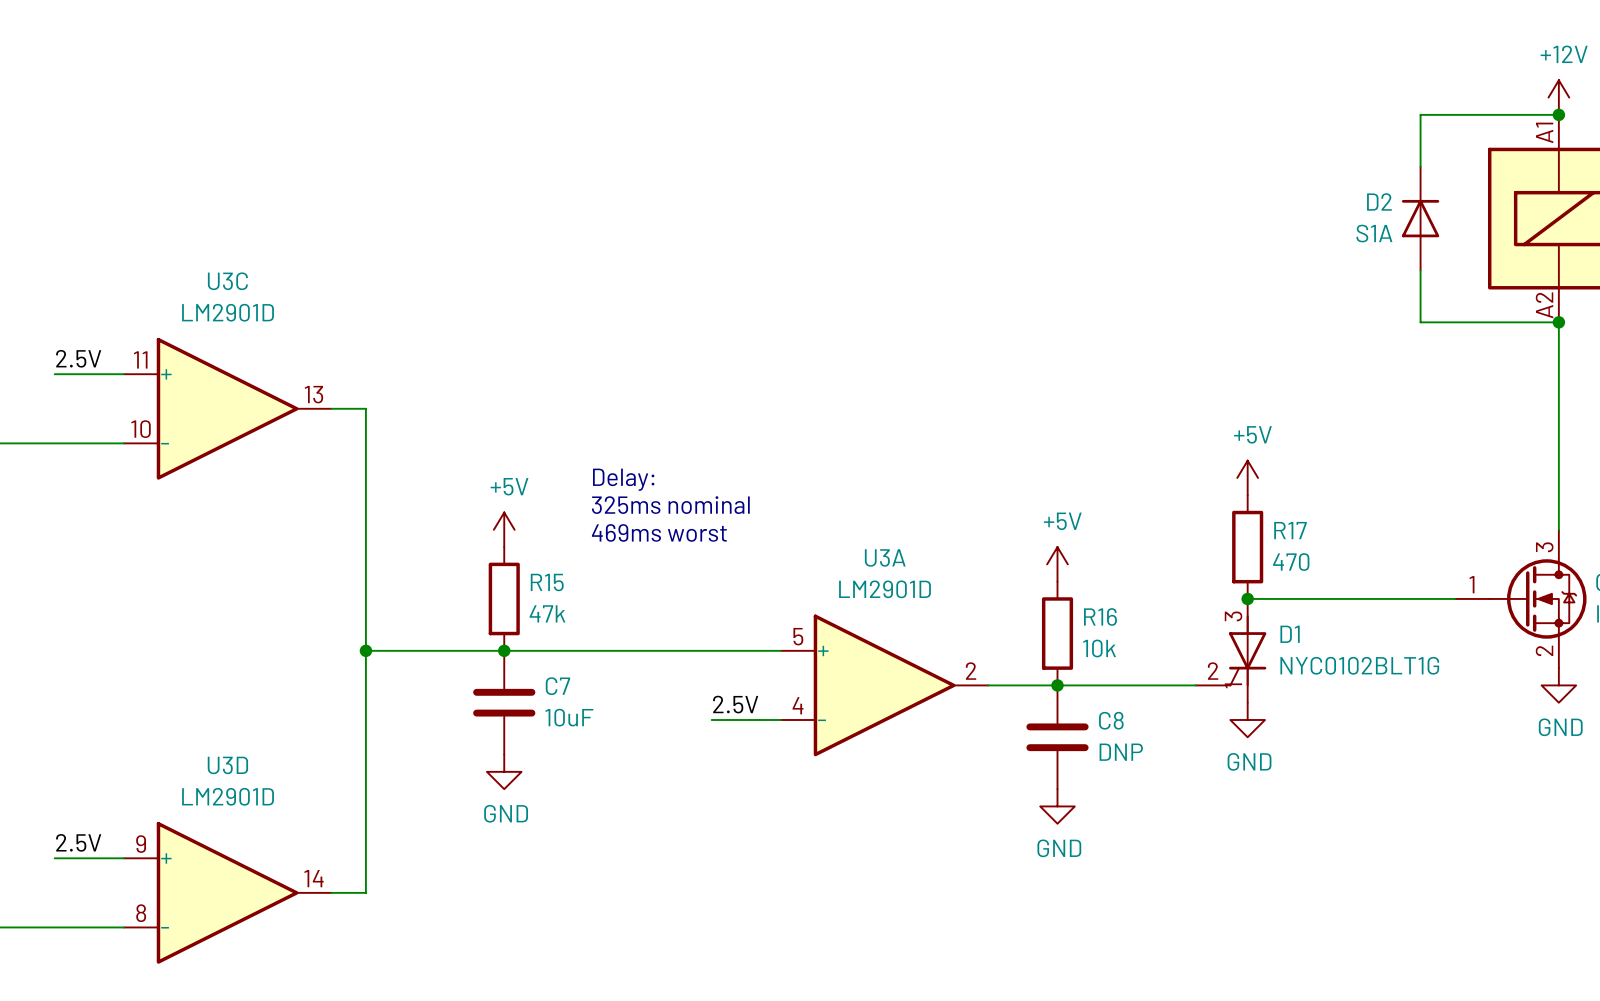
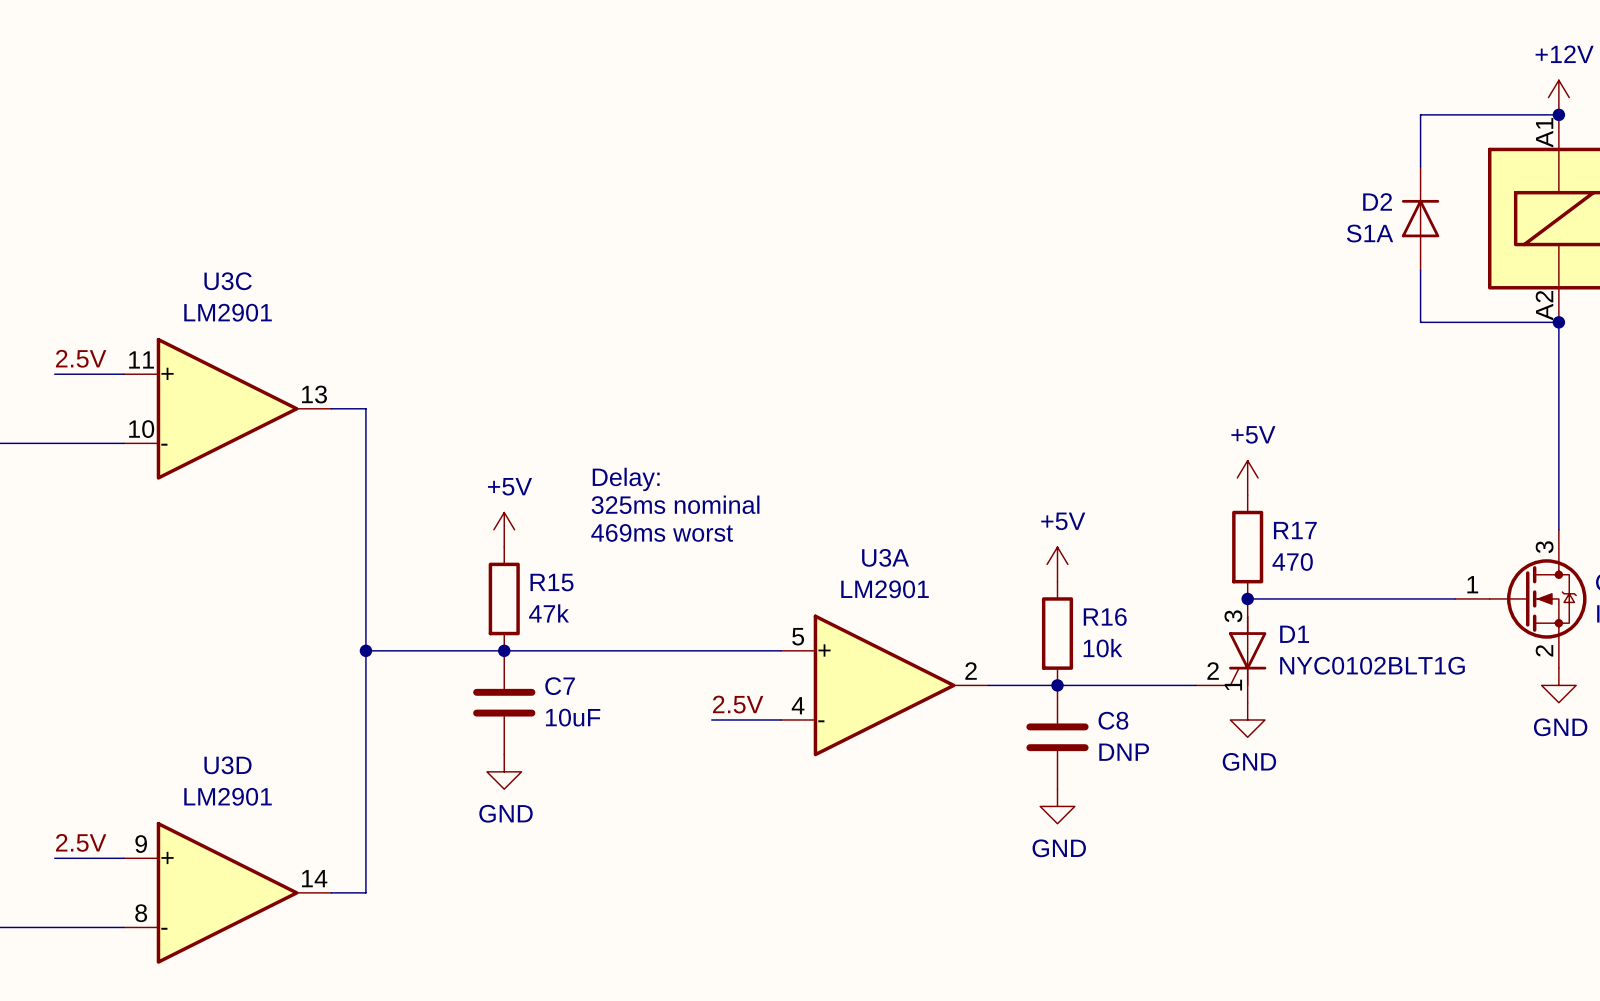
U3C value: LM2901D (228, 312) -> LM2901 (228, 312)
U3A value: LM2901D (885, 589) -> LM2901 (885, 589)
U3D value: LM2901D (228, 796) -> LM2901 (228, 796)

